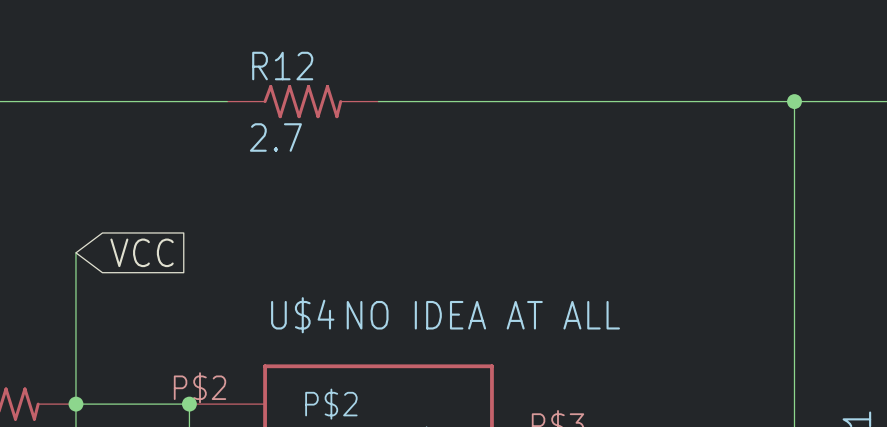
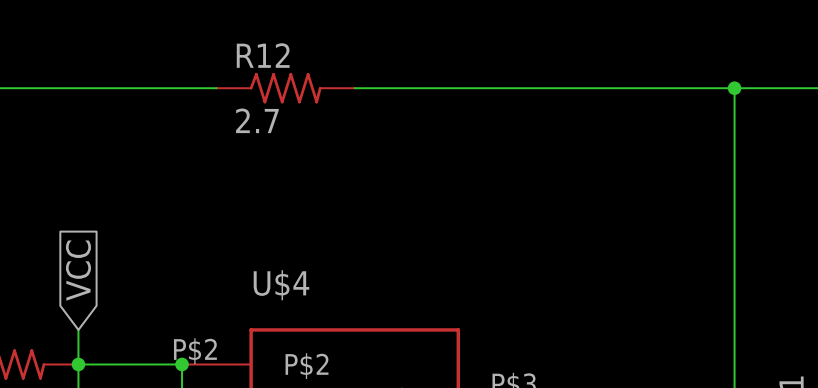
wire: (75, 252) (75, 366) -> none
global label rotation: 0° (142, 252) -> 90° counterclockwise (78, 270)
text: NO IDEA AT ALL (483, 315) -> none

